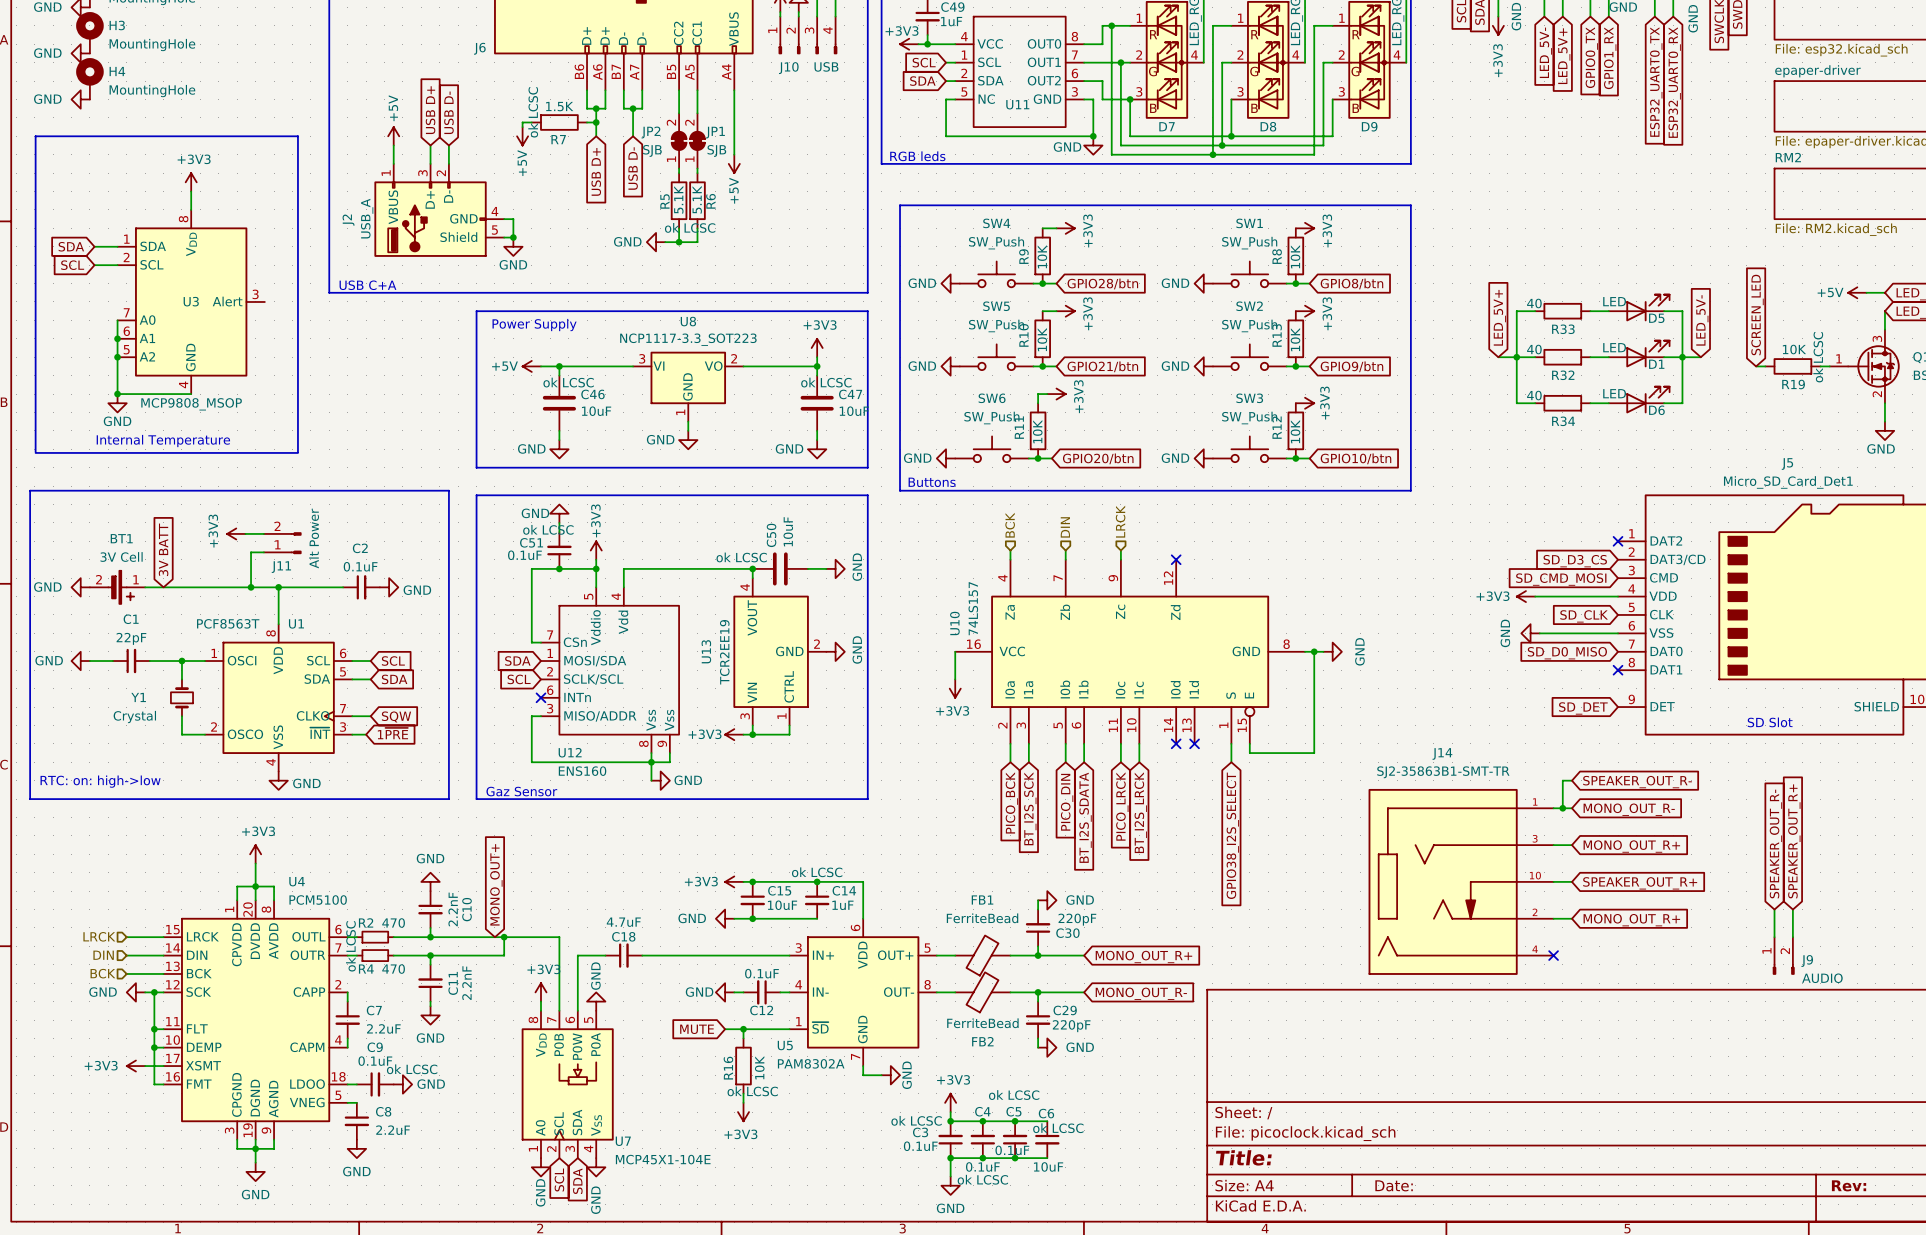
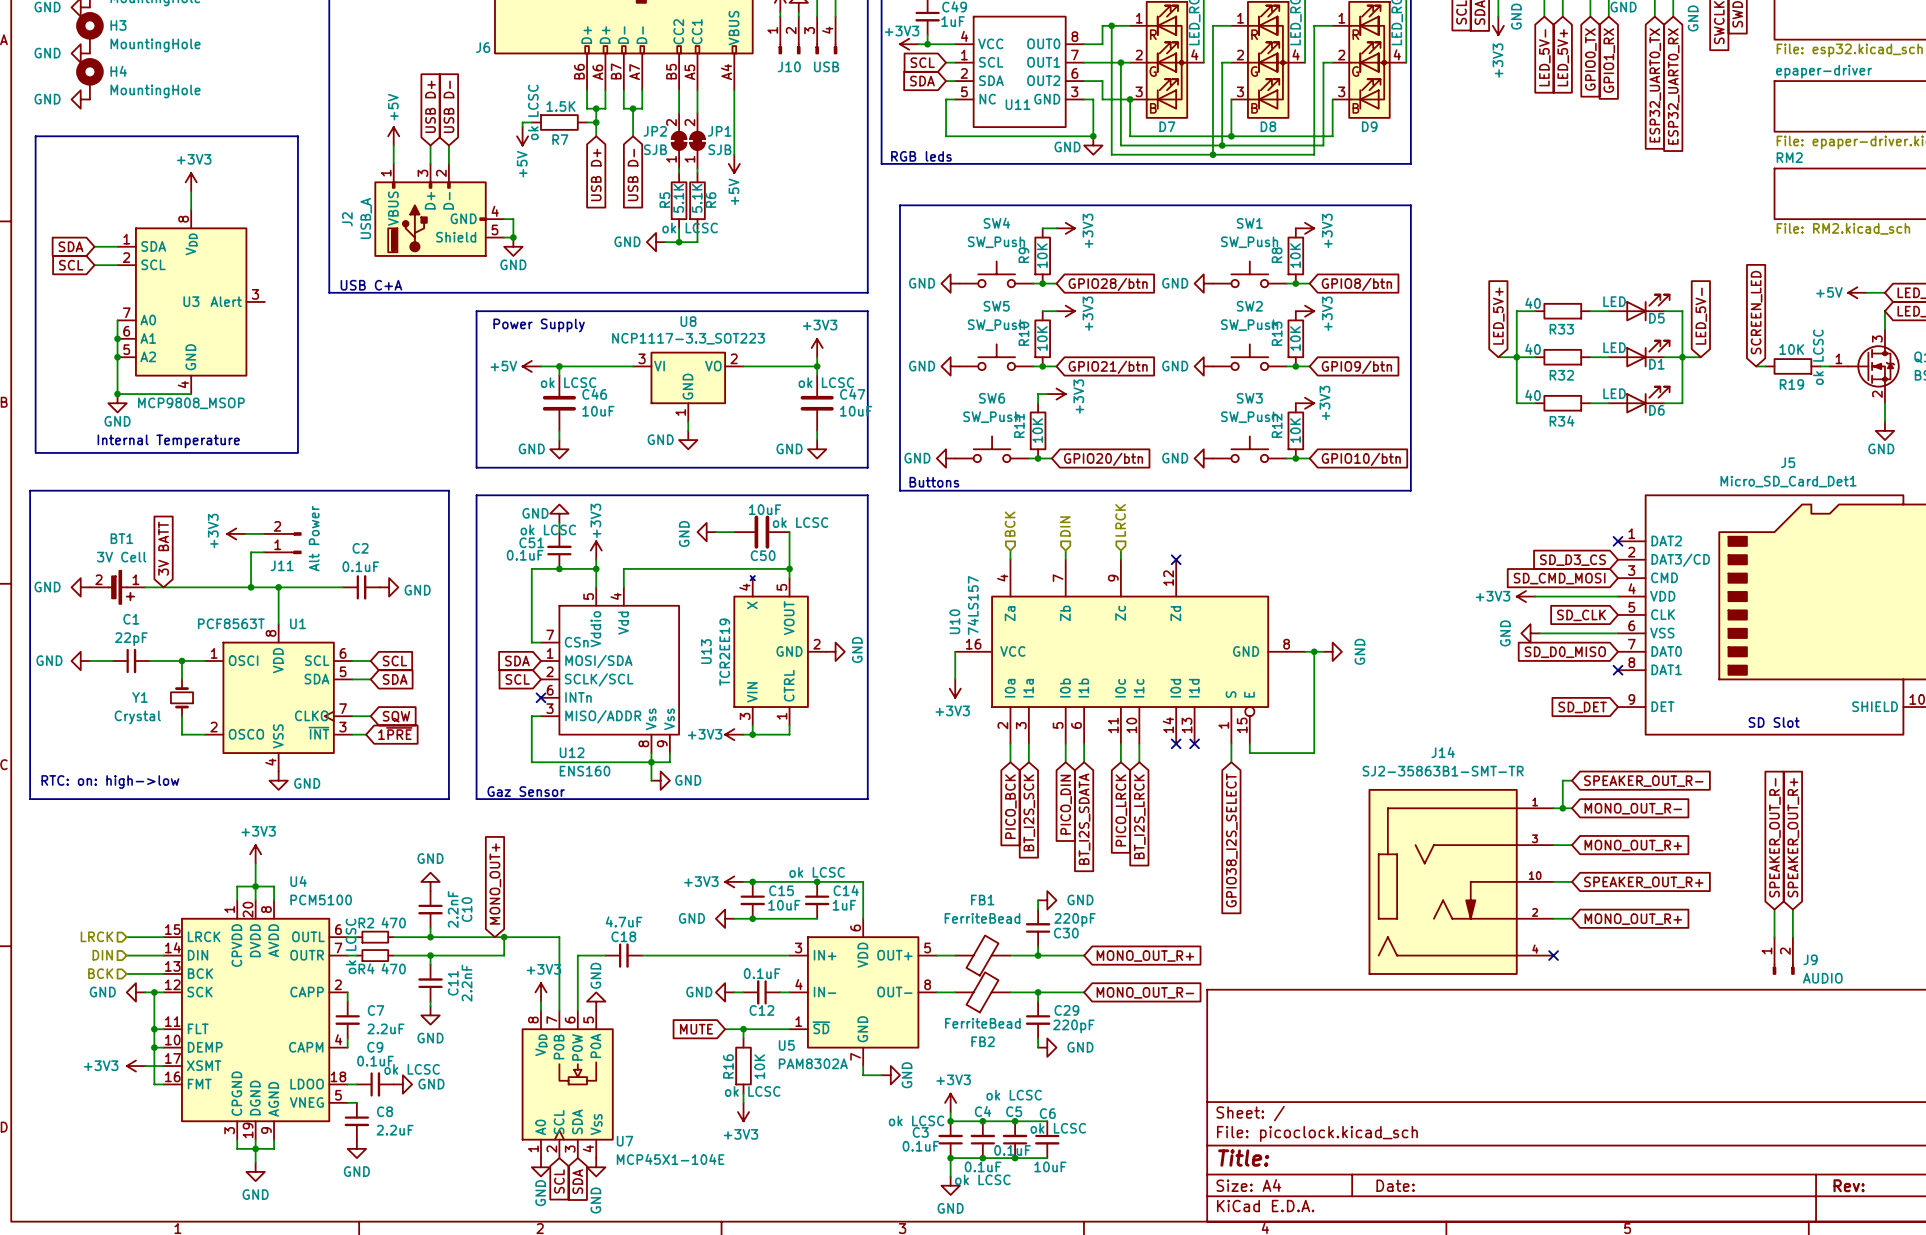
C50 value rotation: 0° (788, 531) -> 90° clockwise (765, 509)
wire: none -> (789, 532) (789, 578)
C50 name rotation: 0° (771, 535) -> 90° clockwise (763, 555)
C50 text position: ok LCSC (741, 557) -> ok LCSC (800, 522)
junction position: (752, 568) -> (789, 568)
C50 position: (780, 568) -> (761, 532)
wire: (807, 568) (826, 568) -> (715, 532) (734, 532)
power symbol rotation: 0° (835, 568) -> 180° (706, 532)
power symbol position: GND (835, 568) -> GND (706, 532)
U13 symbol: [733, 578, 827, 726] -> [733, 575, 827, 726]

